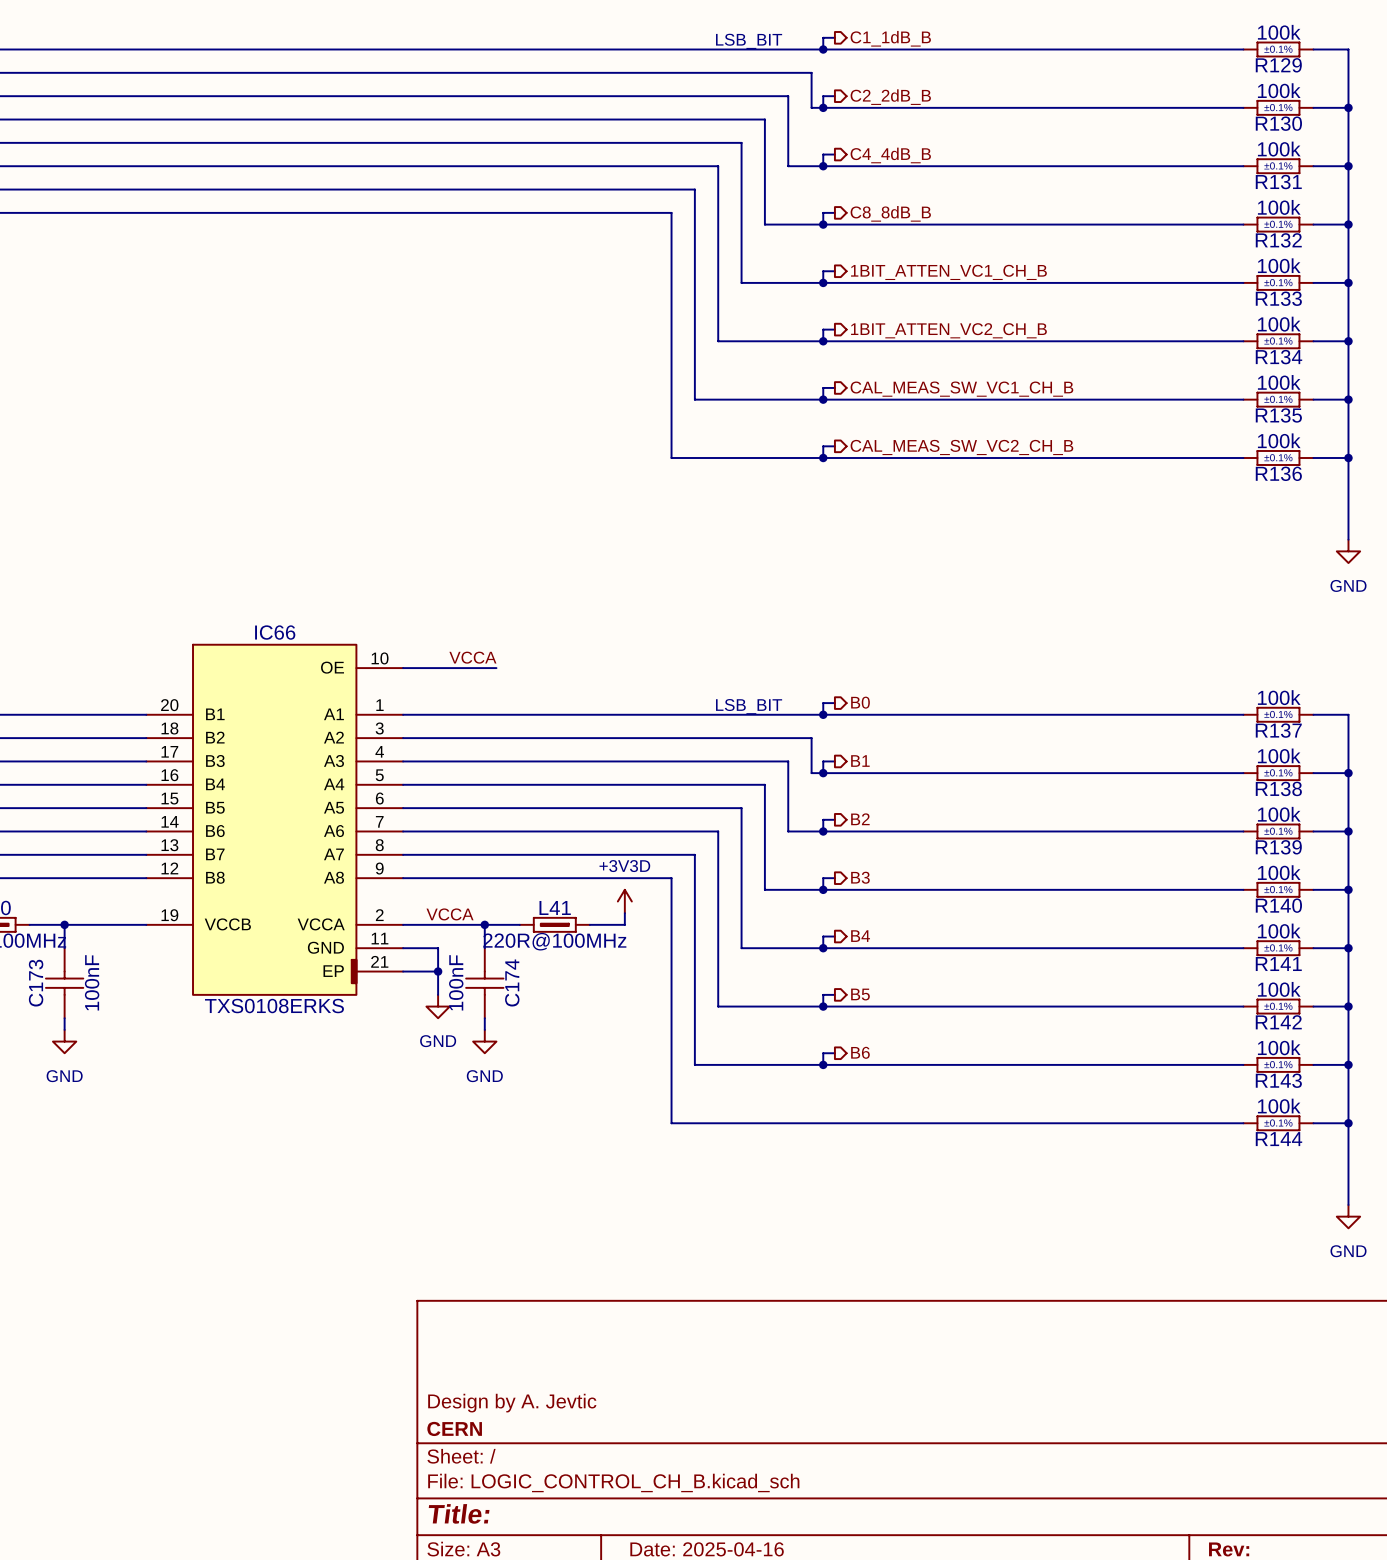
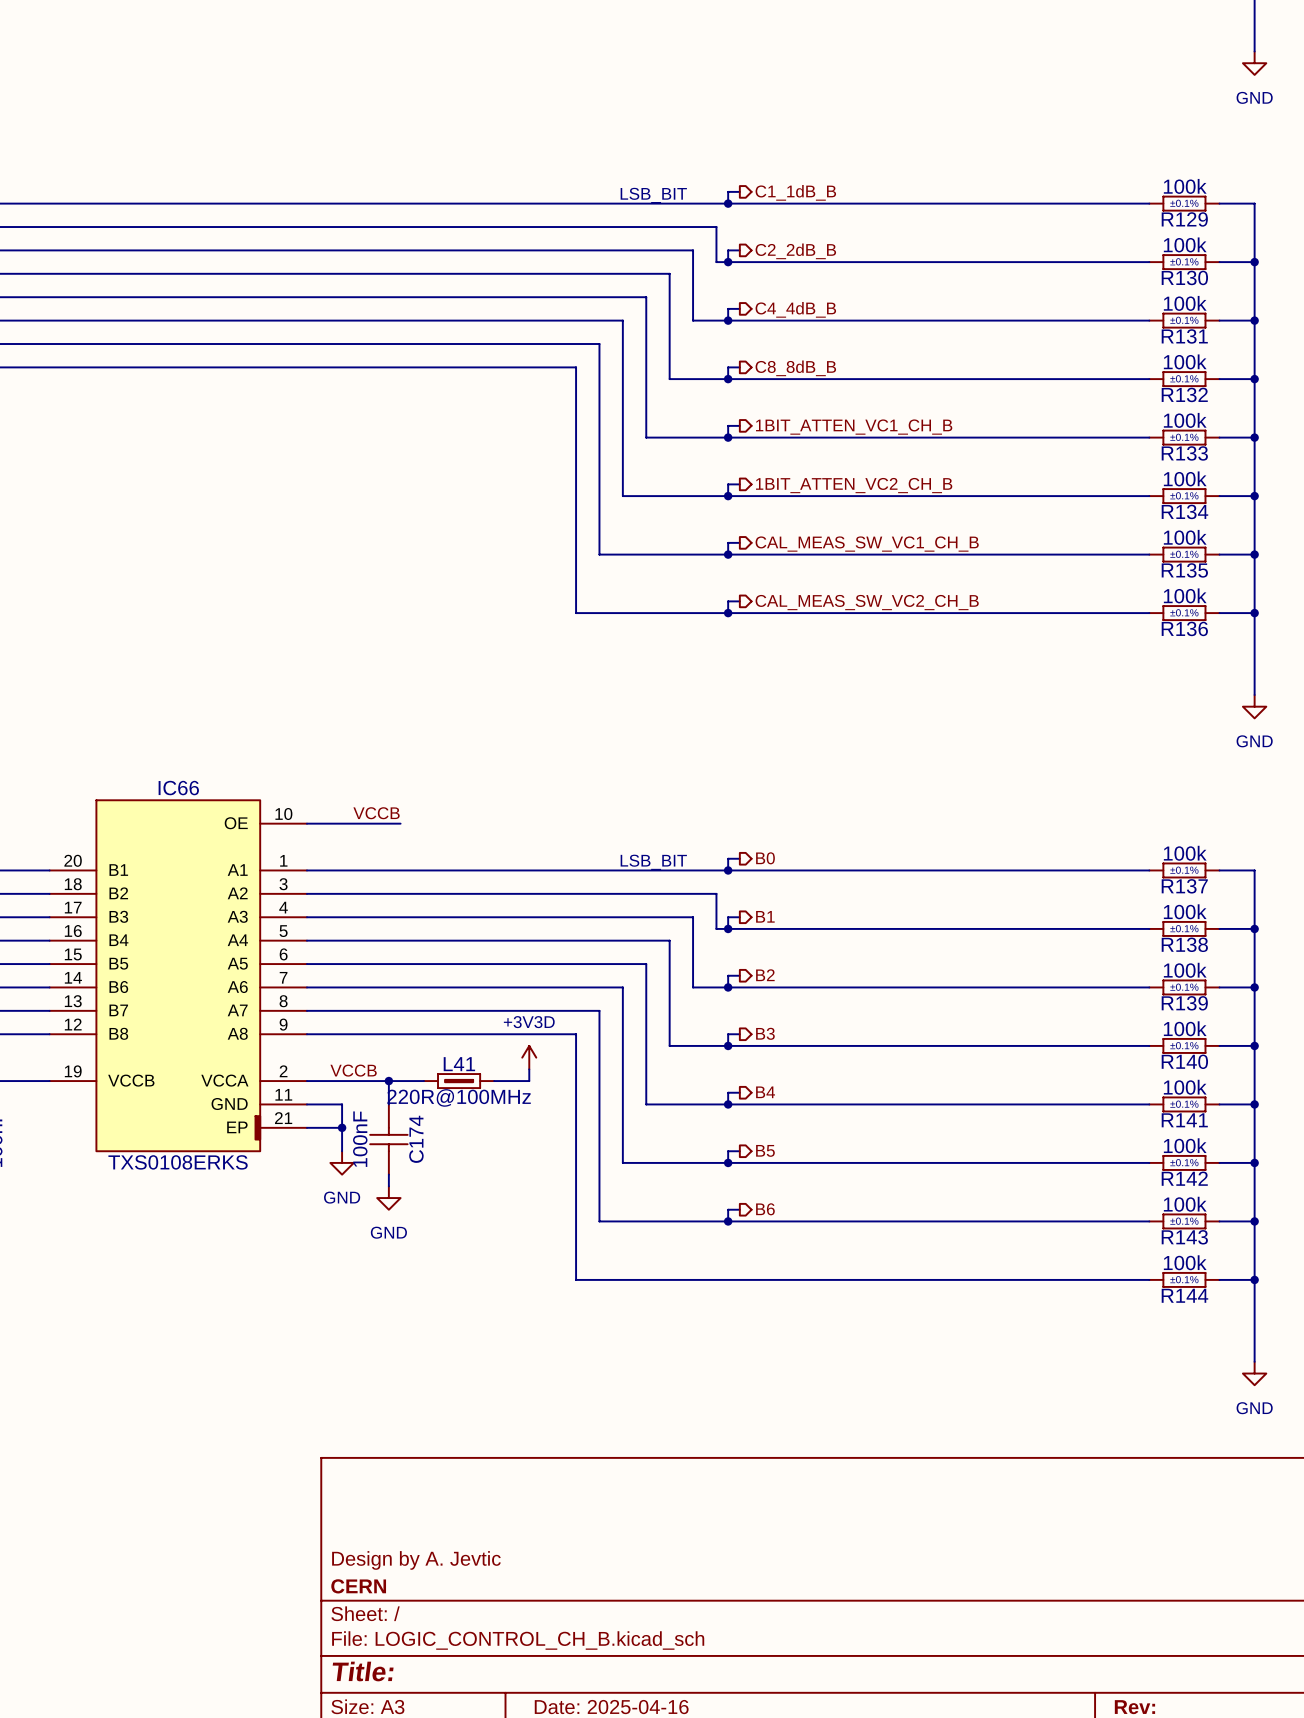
label: VCCA (472, 657) -> VCCB (376, 813)
label: VCCA (450, 914) -> VCCB (353, 1070)

